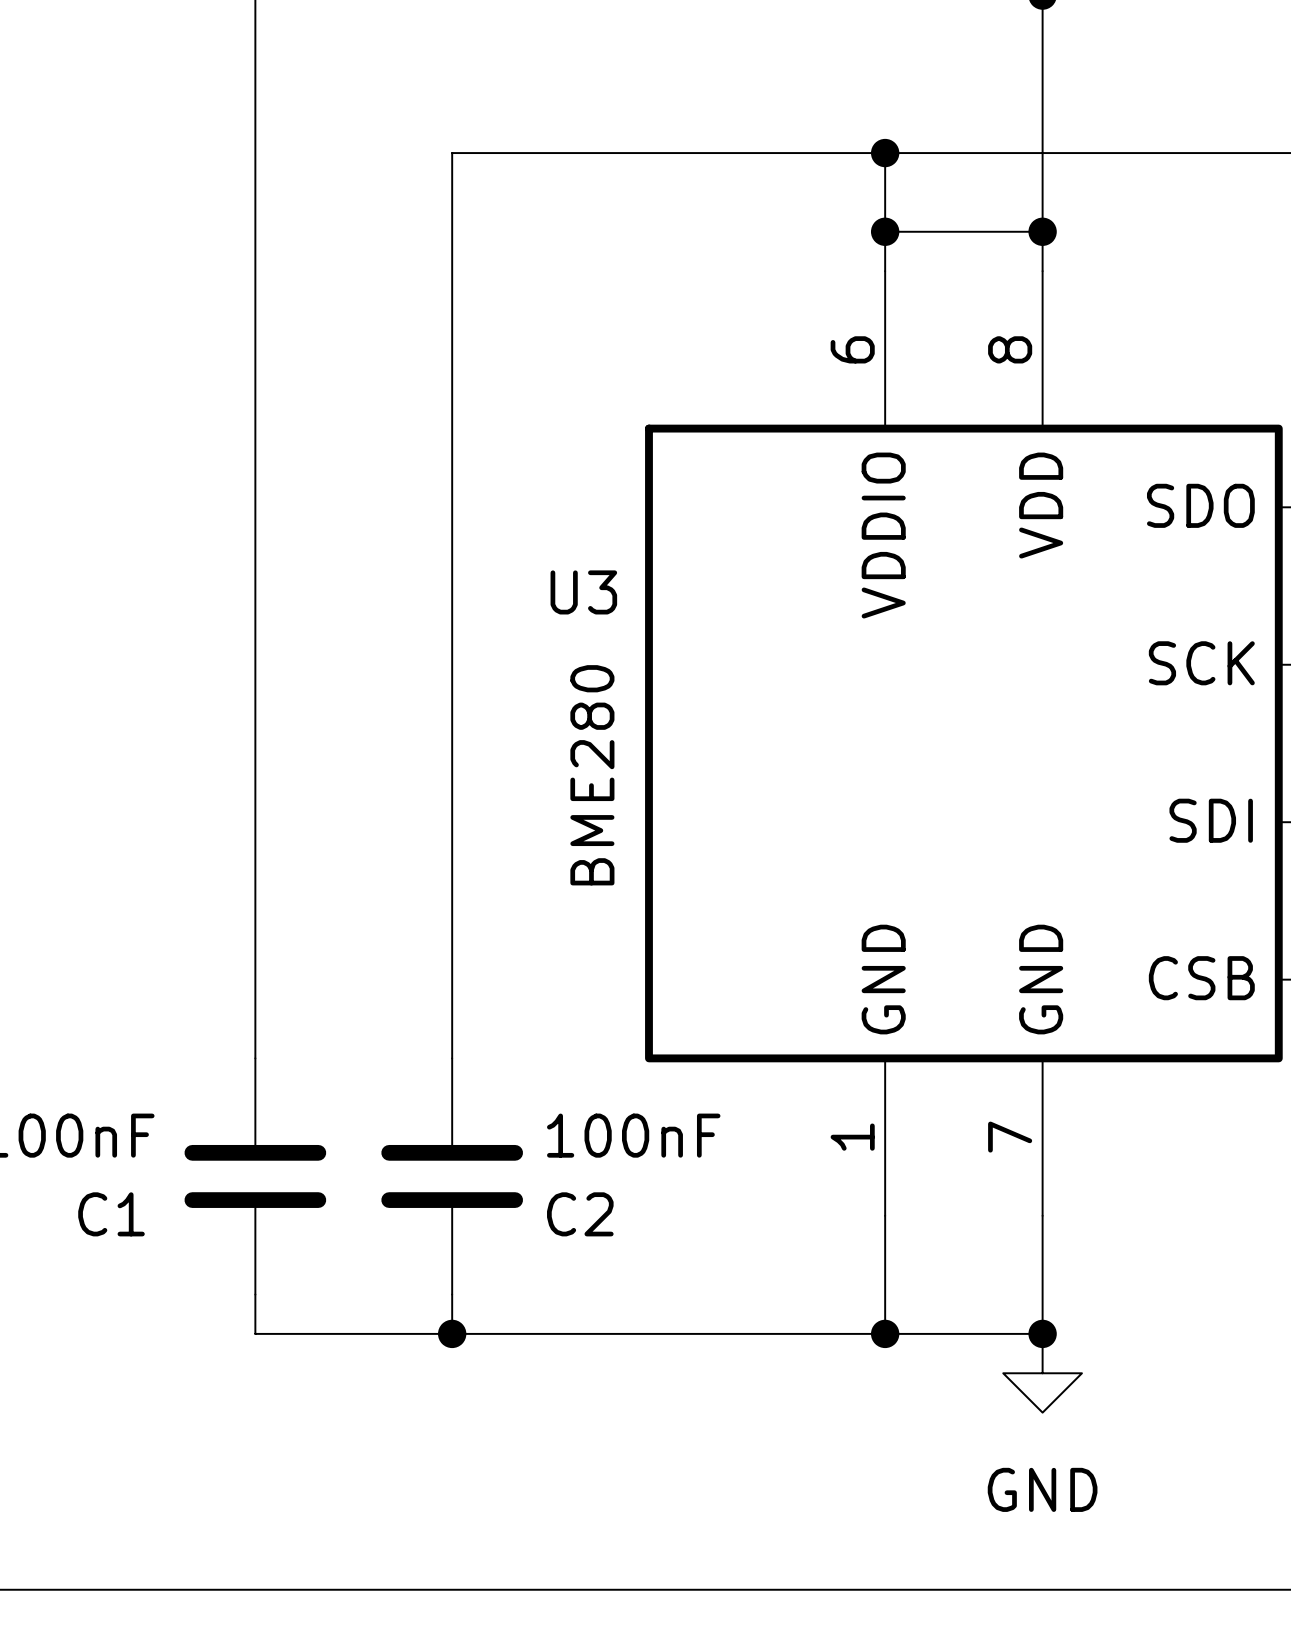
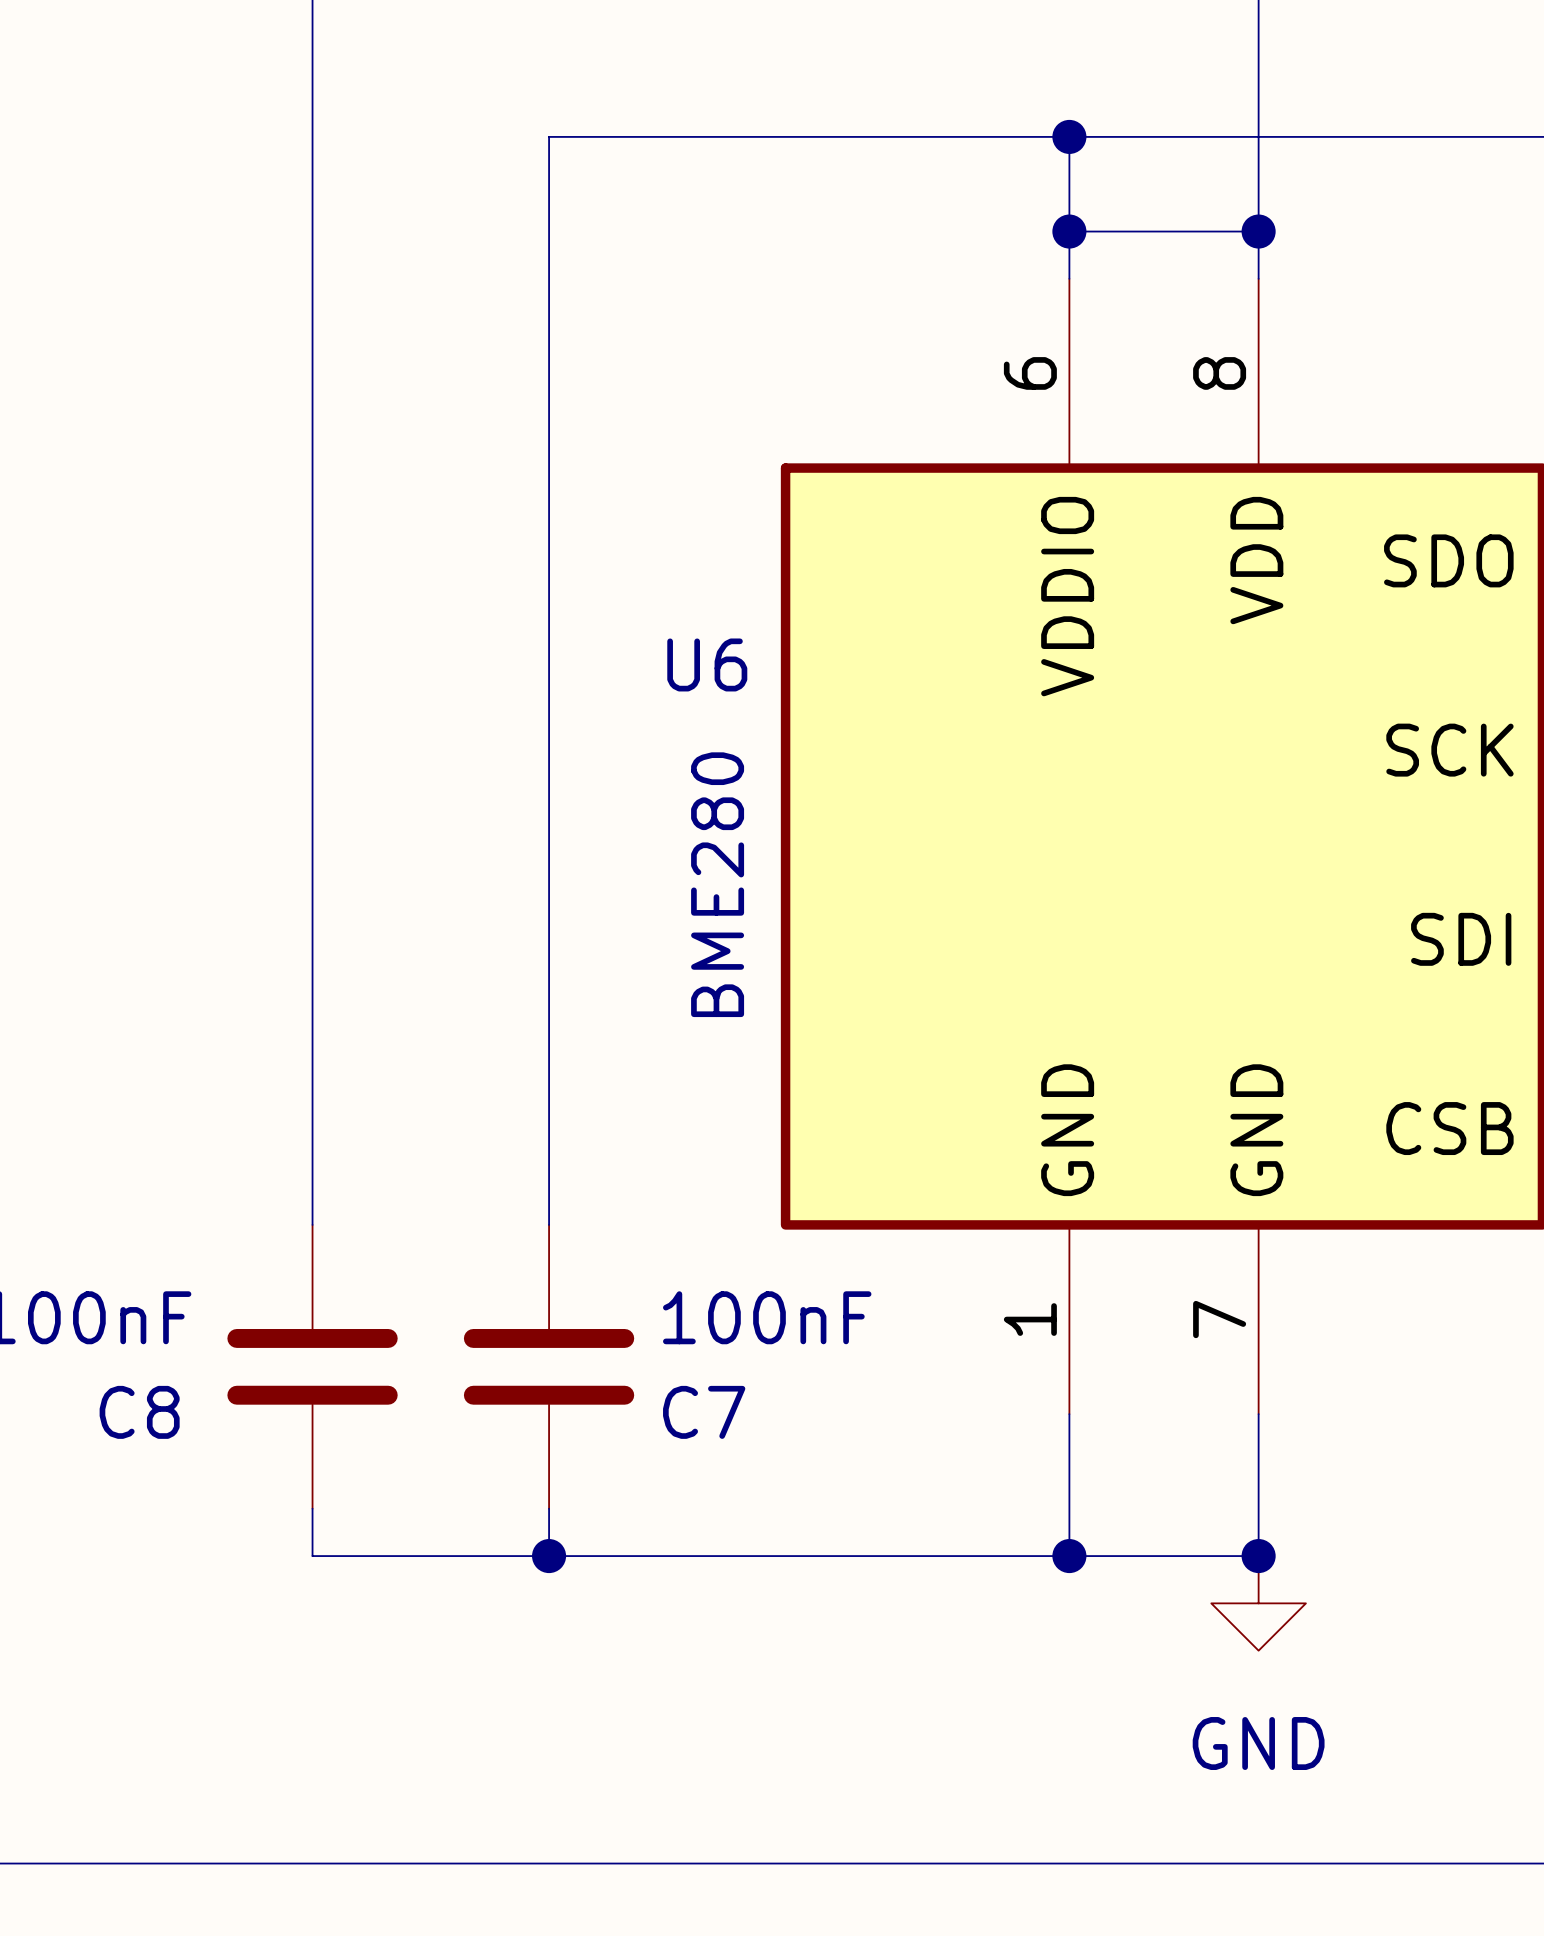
U3 name: U3 (583, 592) -> U6 (707, 664)
C1 name: C1 (111, 1214) -> C8 (139, 1412)
C2 name: C2 (580, 1214) -> C7 (704, 1412)

